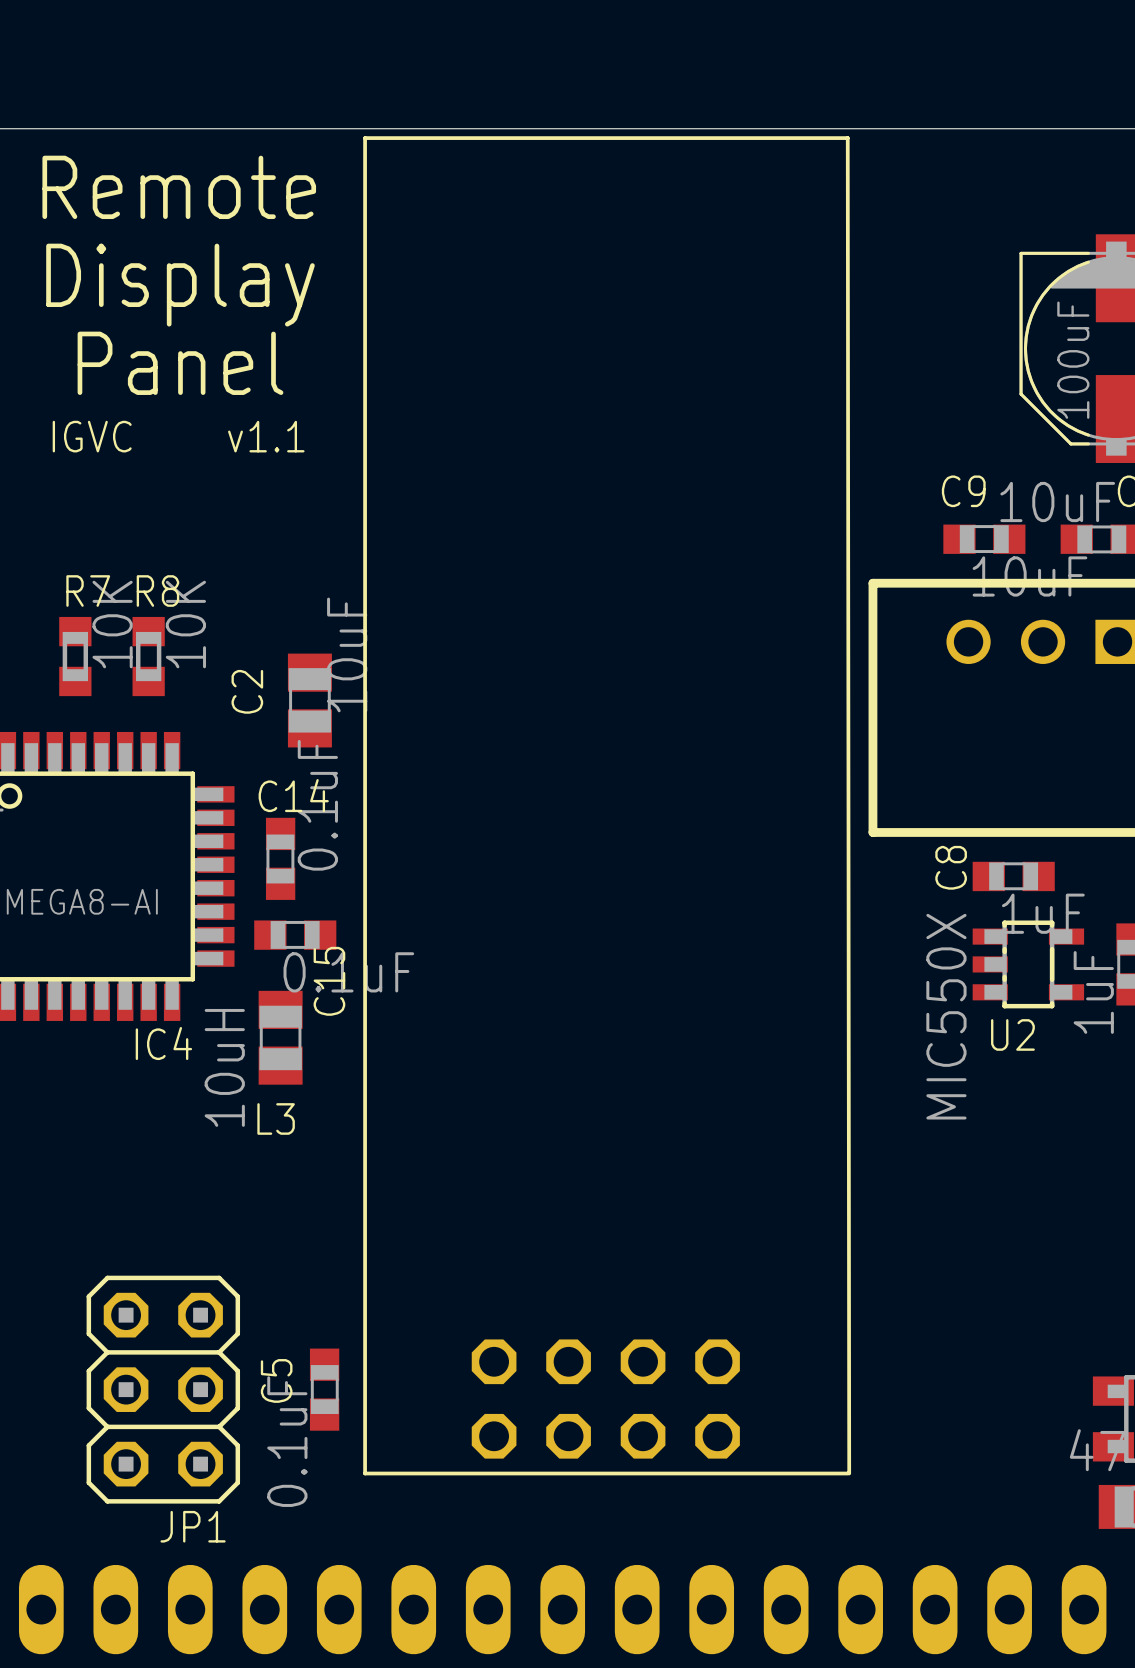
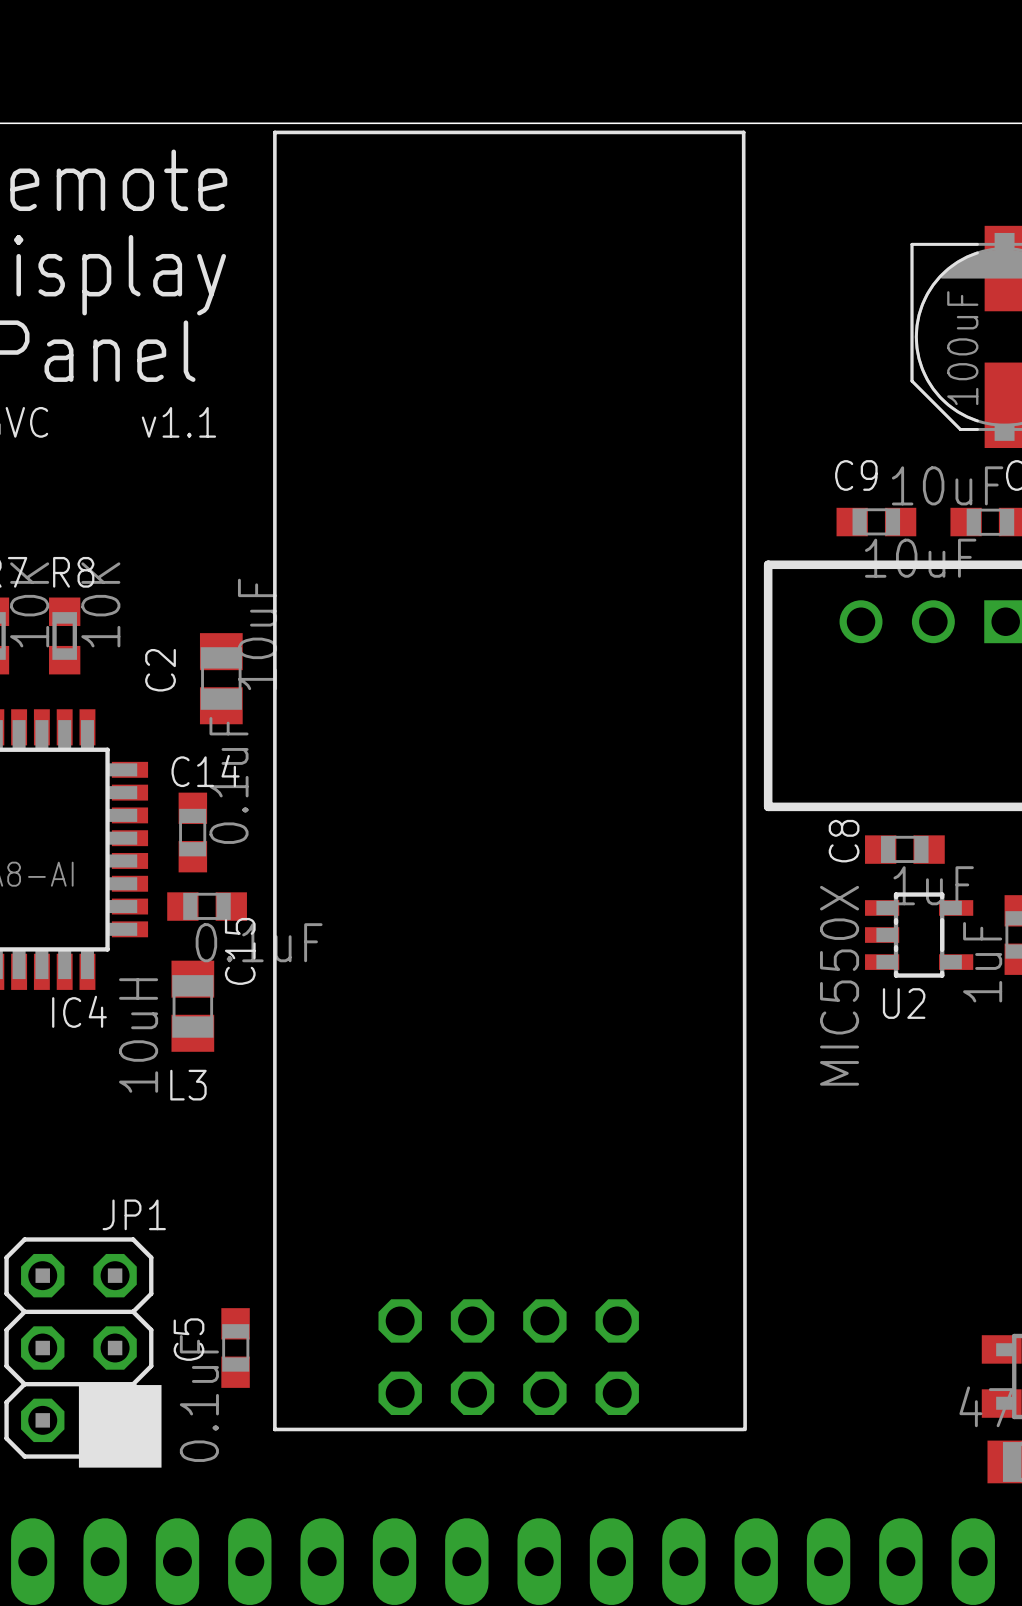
drawing: none -> [78, 1385, 162, 1468]
JP1 name position: JP1 (193, 1526) -> JP1 (134, 1214)

